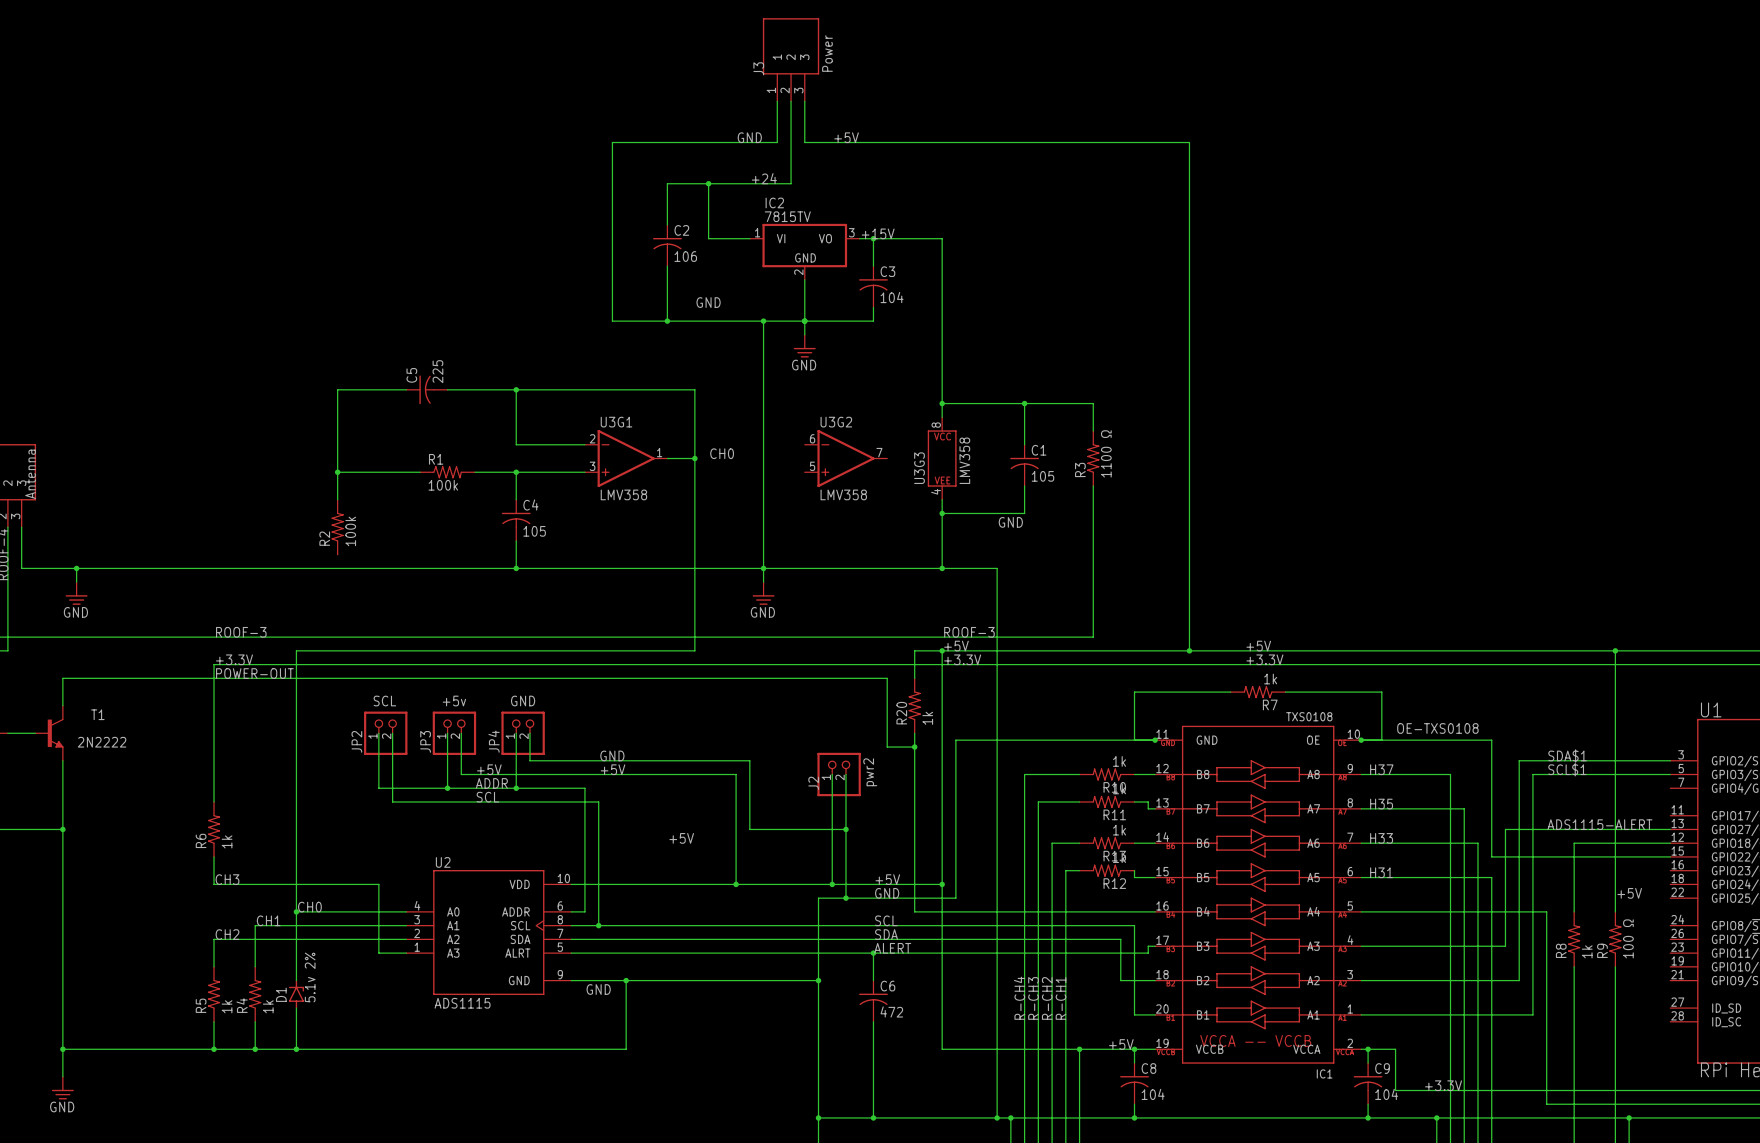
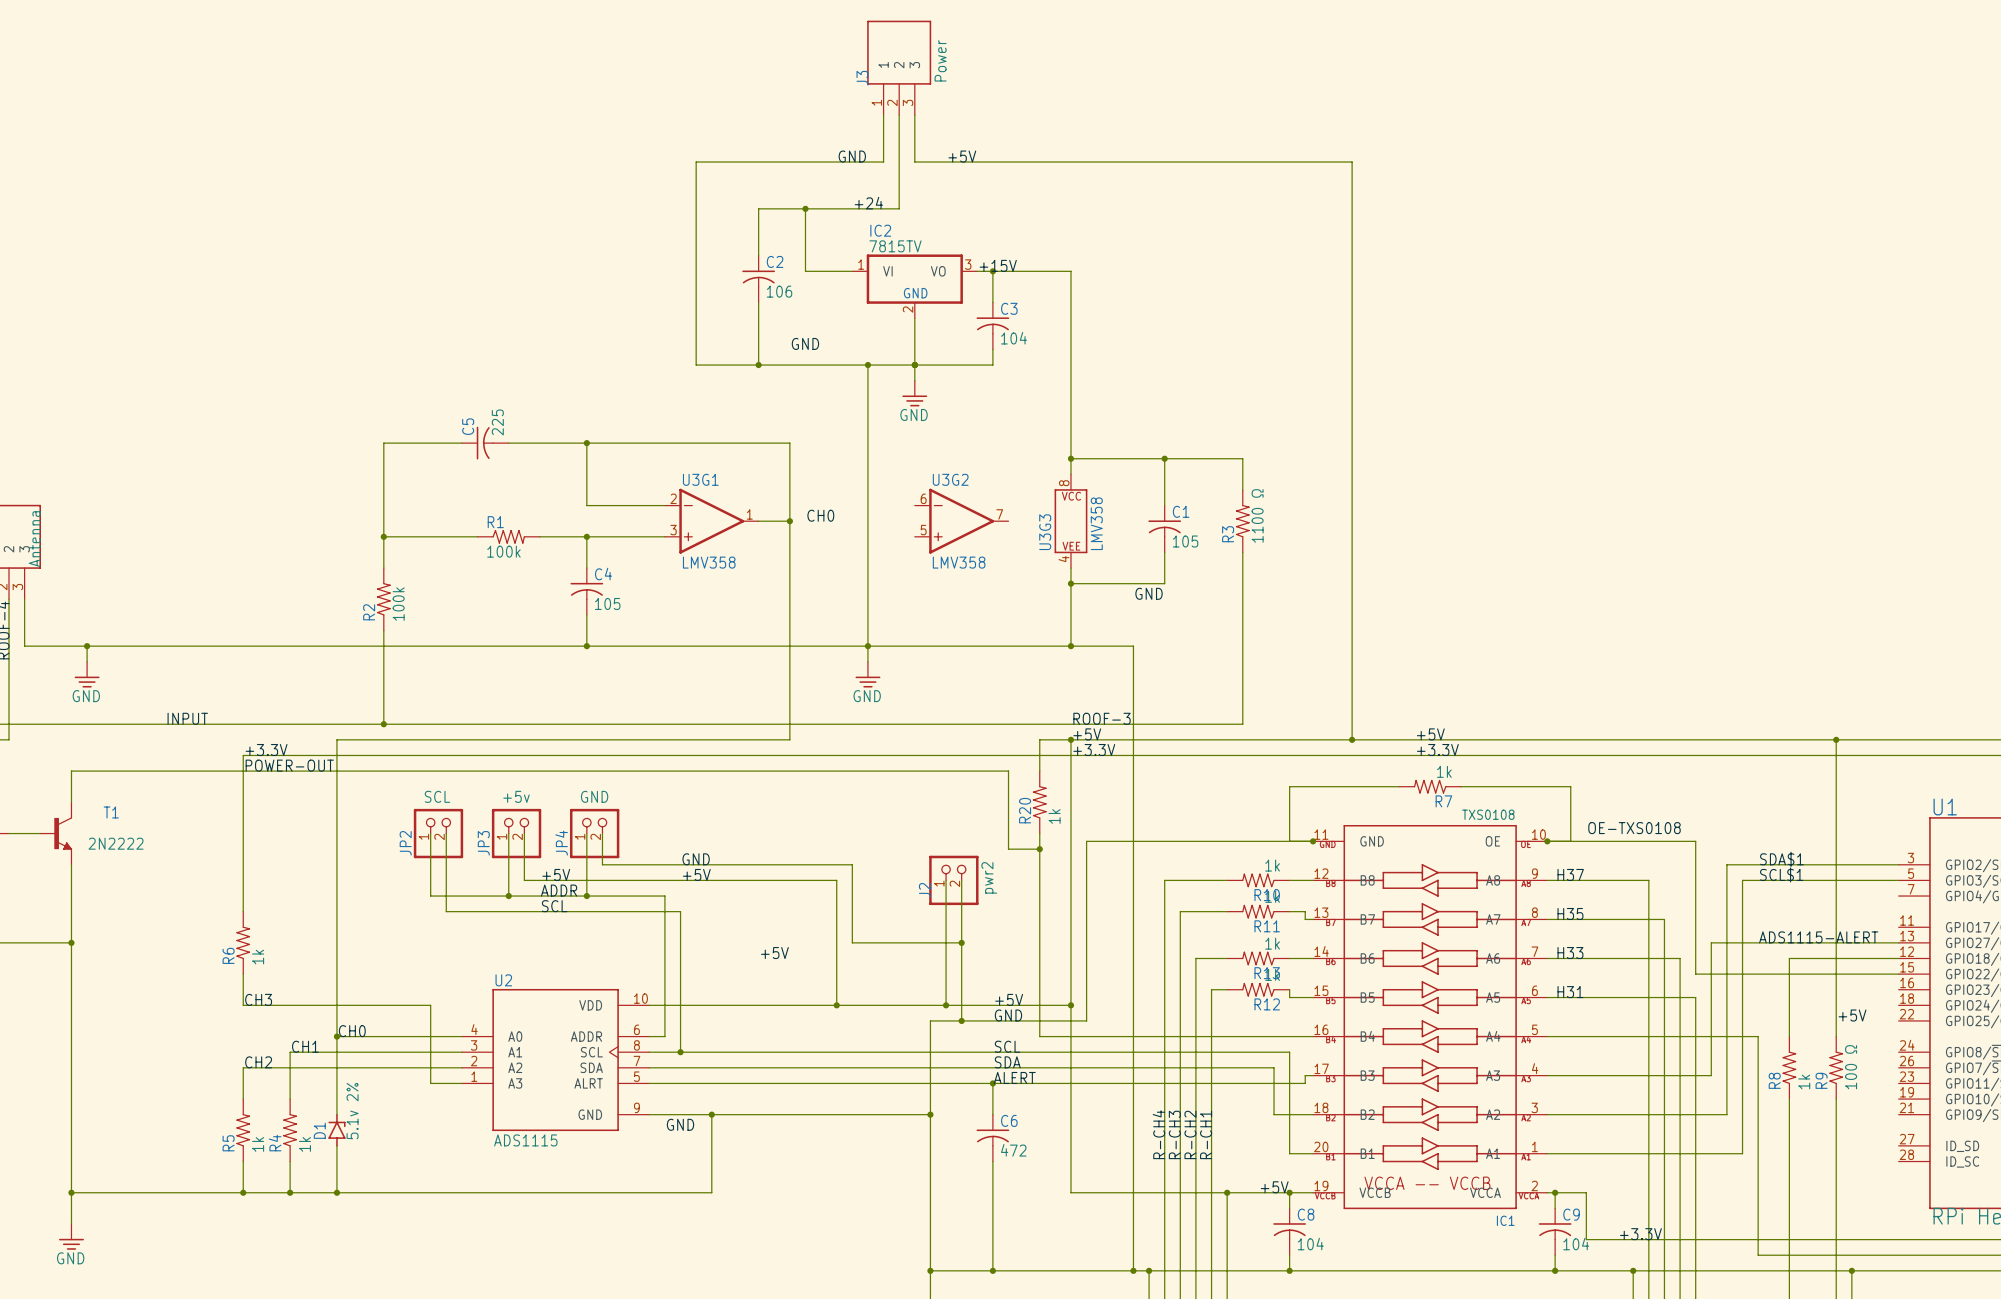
wire: none -> (383, 630) (383, 724)
label: none -> INPUT (187, 718)
label: ROOF-3 (241, 632) -> none
junction: none -> (383, 724)

